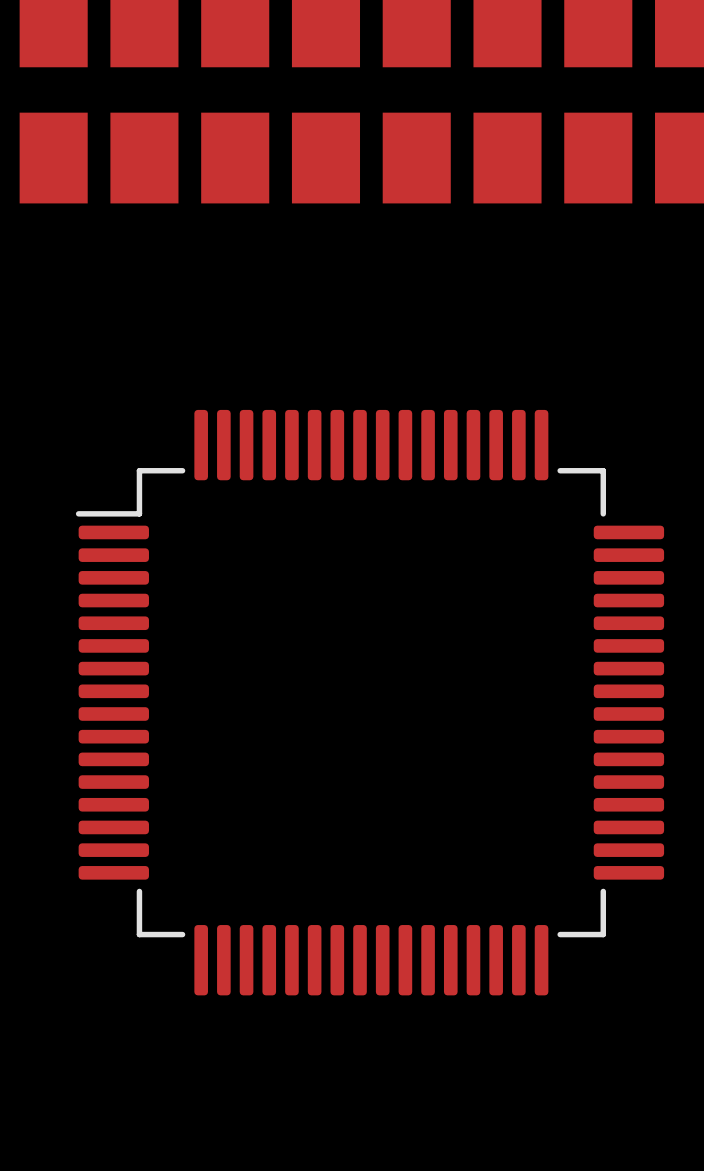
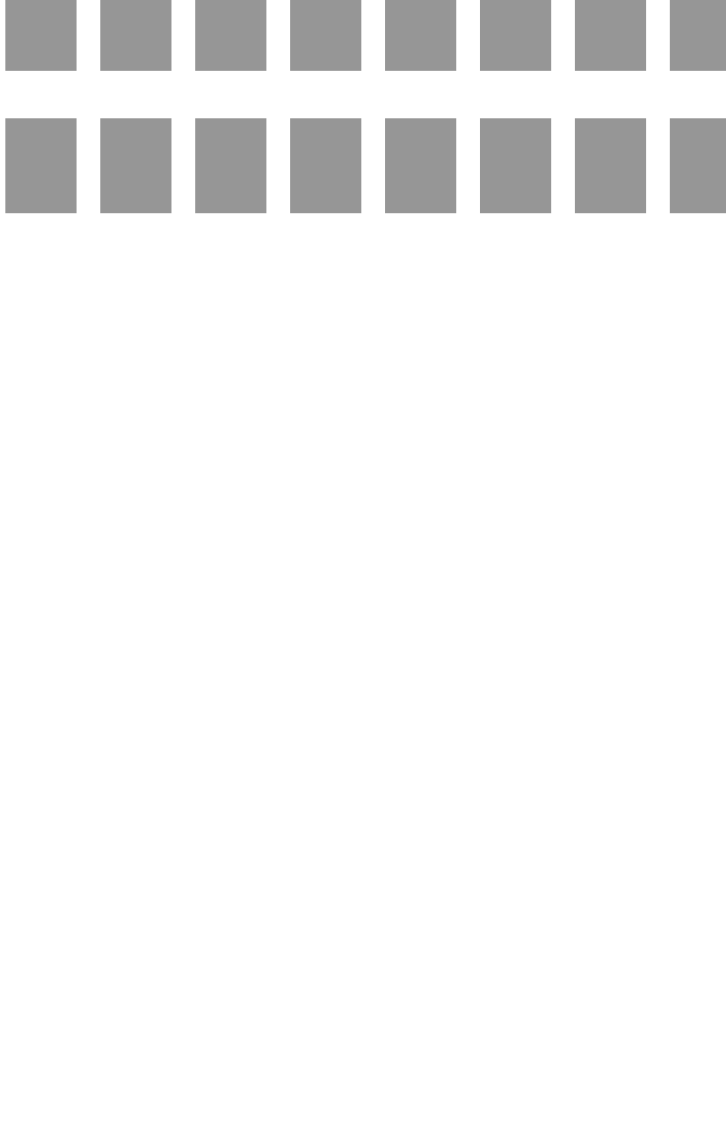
part: (370, 702) -> none

